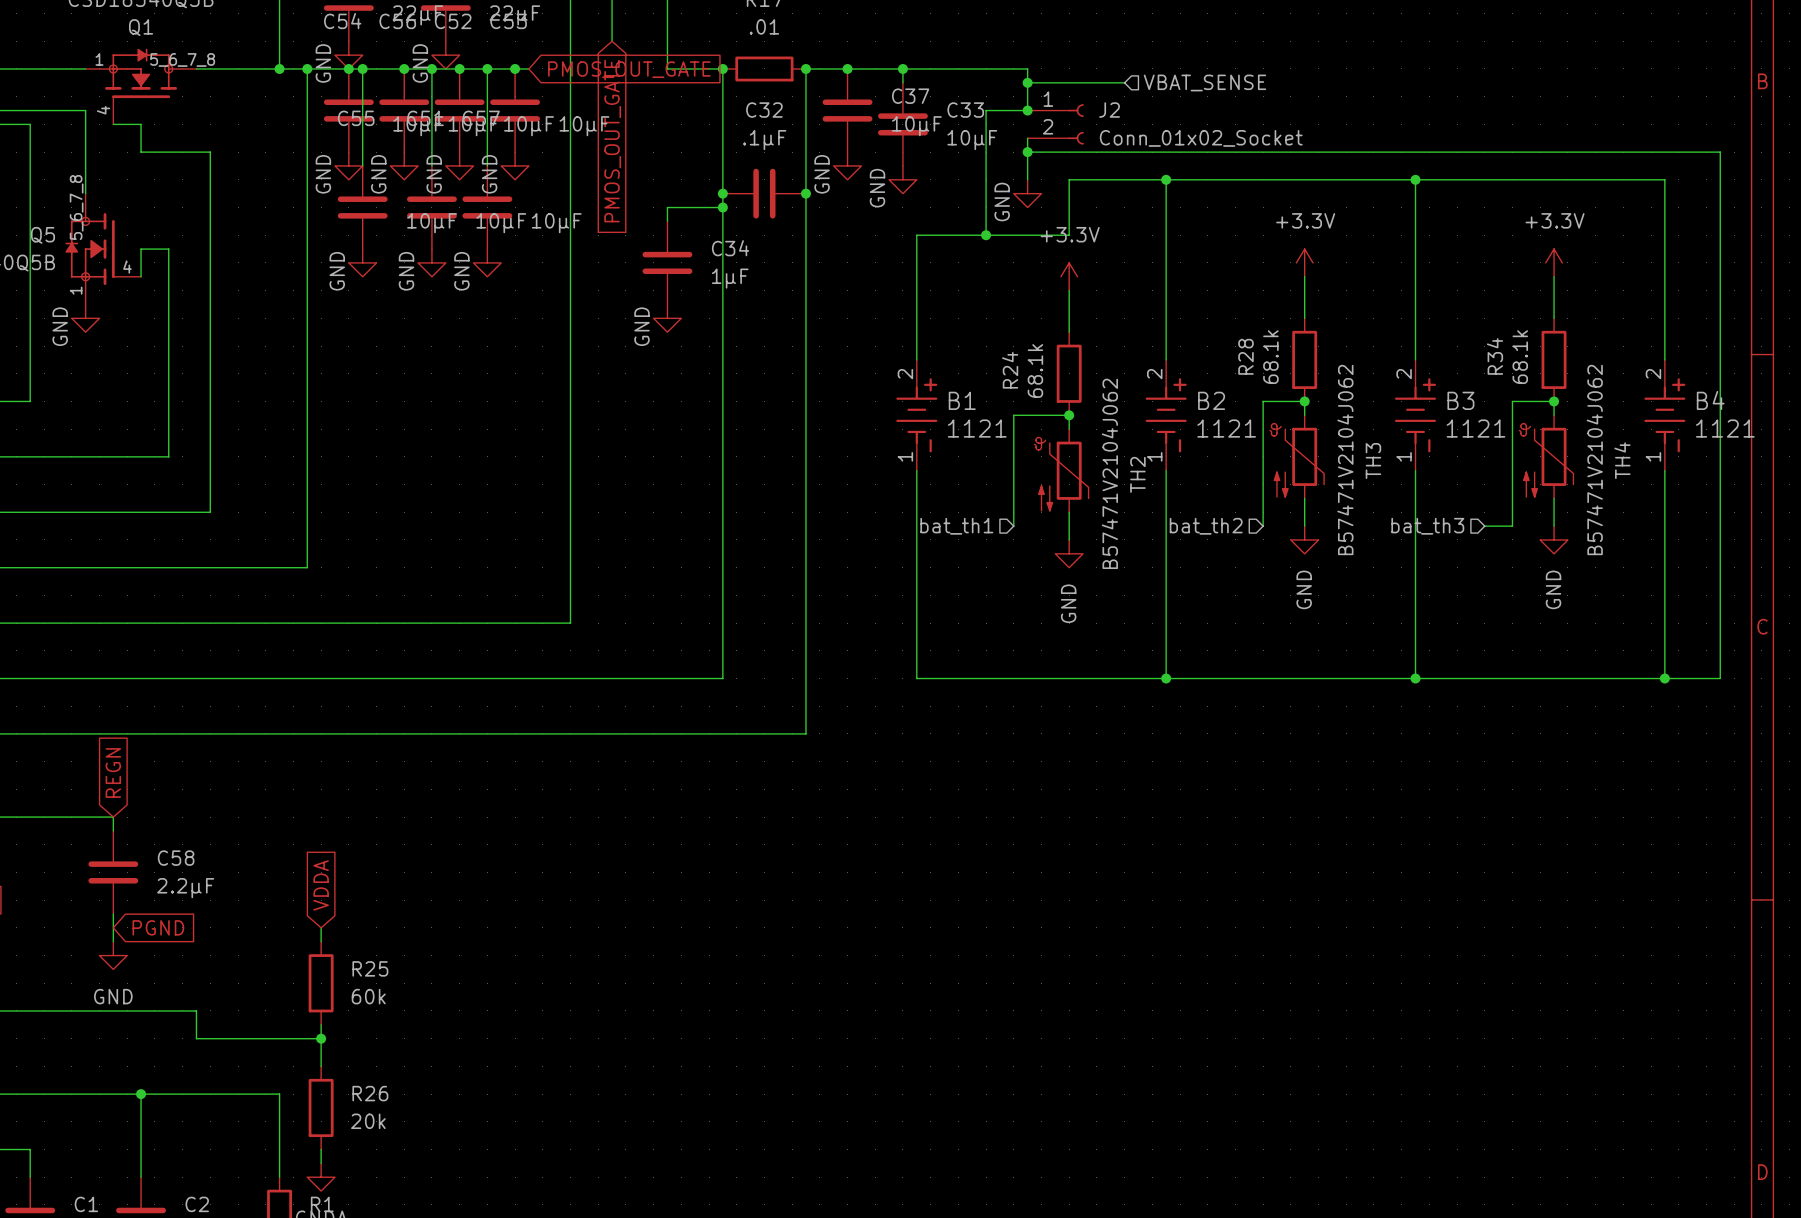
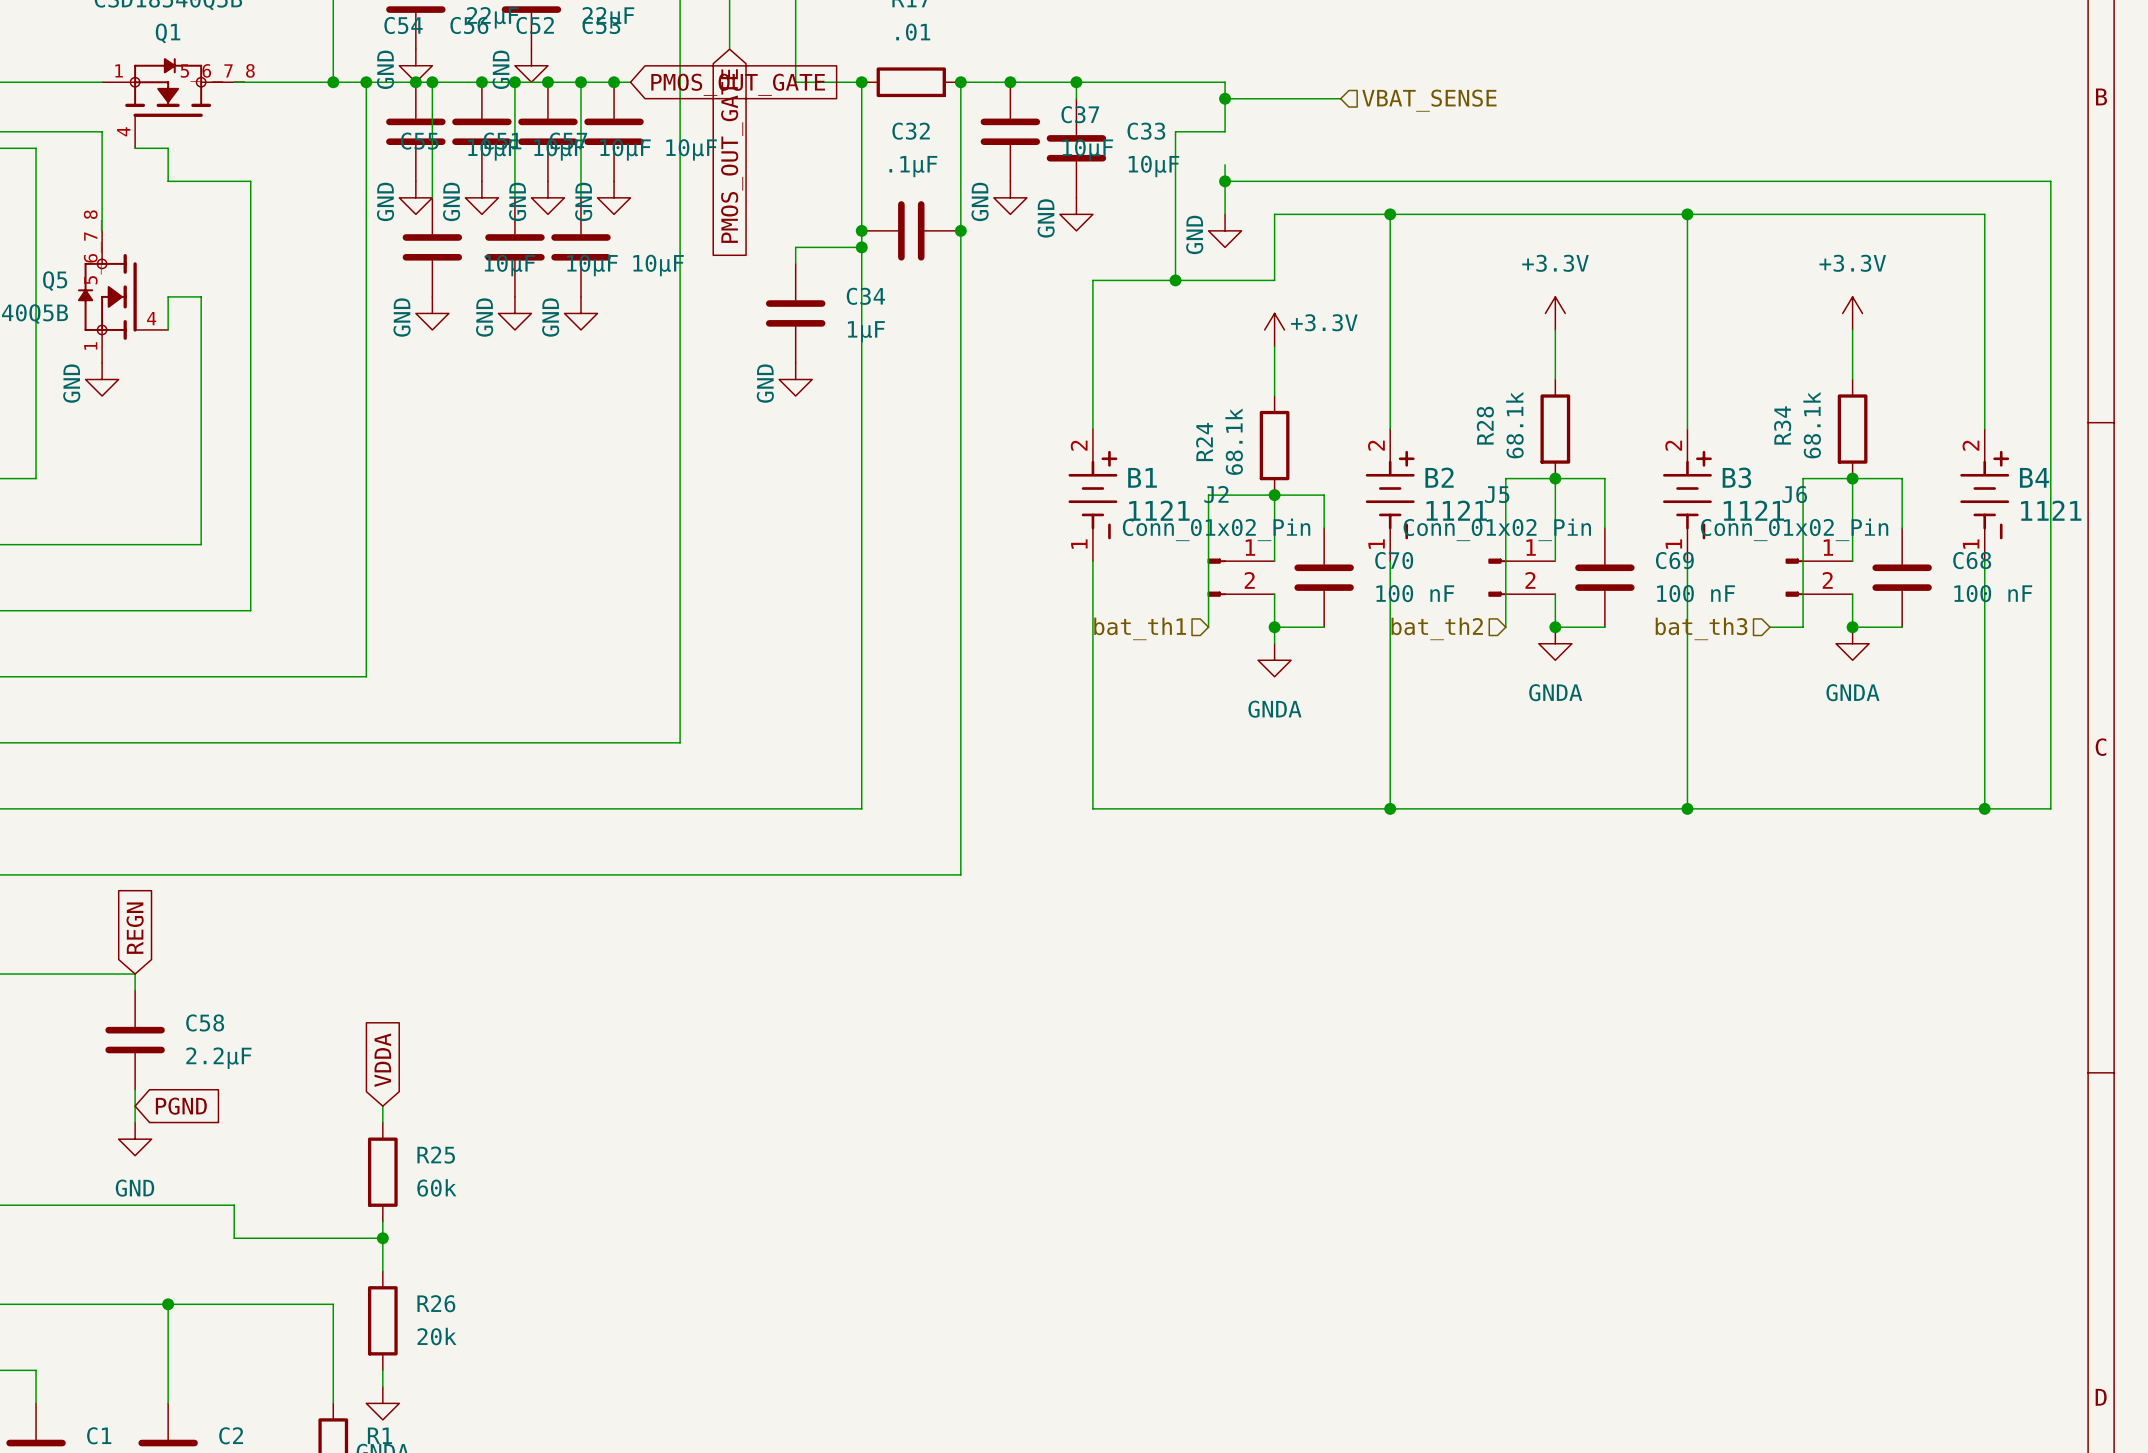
J2 symbol: [1027, 104, 1084, 145] -> [1207, 558, 1275, 597]
junction: (1027, 110) -> none
J2 name position: J2 (1109, 110) -> J2 (1216, 494)
J2 value: Conn_01x02_Socket (1201, 138) -> Conn_01x02_Pin (1216, 529)
power symbol text position: +3.3V (1070, 234) -> +3.3V (1324, 322)
wire: none -> (1555, 478) (1604, 478) (1604, 528)
wire: none -> (1852, 478) (1902, 478) (1902, 528)
wire: none -> (1274, 495) (1324, 495) (1324, 528)
wire: none -> (1555, 495) (1555, 561)
wire: none -> (1852, 495) (1852, 561)
wire: none -> (1274, 511) (1274, 561)
TH3: B57471V2104J062 (1297, 456) -> none
TH4: B57471V2104J062 (1546, 456) -> none
TH2: B57471V2104J062 (1061, 470) -> none
C70: none -> 100 nF (1324, 577)
J5: none -> Conn_01x02_Pin (1521, 577)
C69: none -> 100 nF (1604, 577)
J6: none -> Conn_01x02_Pin (1819, 577)
C68: none -> 100 nF (1902, 577)
wire: none -> (1274, 627) (1324, 627)
junction: none -> (1274, 627)
wire: none -> (1555, 627) (1604, 627)
junction: none -> (1555, 627)
wire: none -> (1852, 627) (1902, 627)
junction: none -> (1852, 627)
power symbol: GND (1304, 539) -> GNDA (1555, 643)
power symbol: GND (1554, 539) -> GNDA (1852, 643)
power symbol: GND (1069, 553) -> GNDA (1274, 660)

